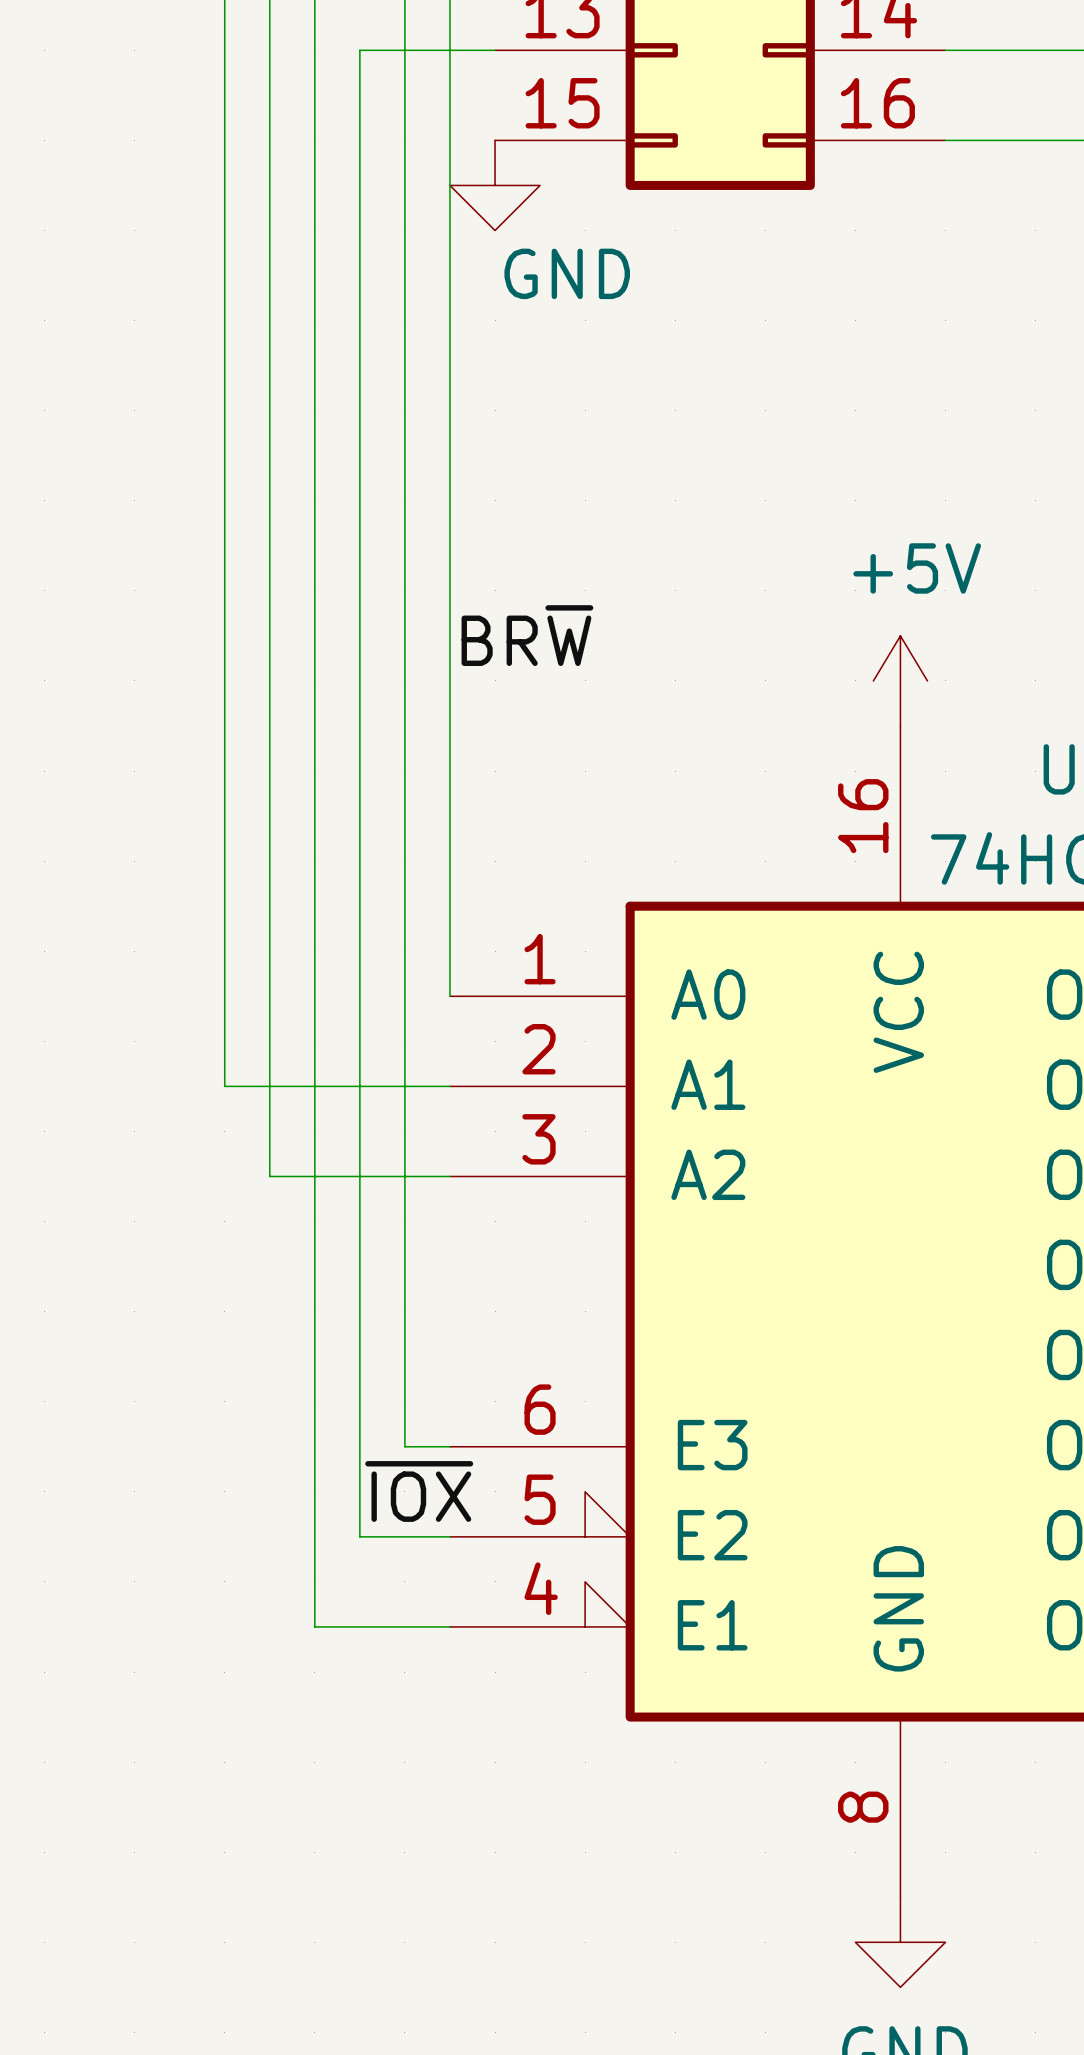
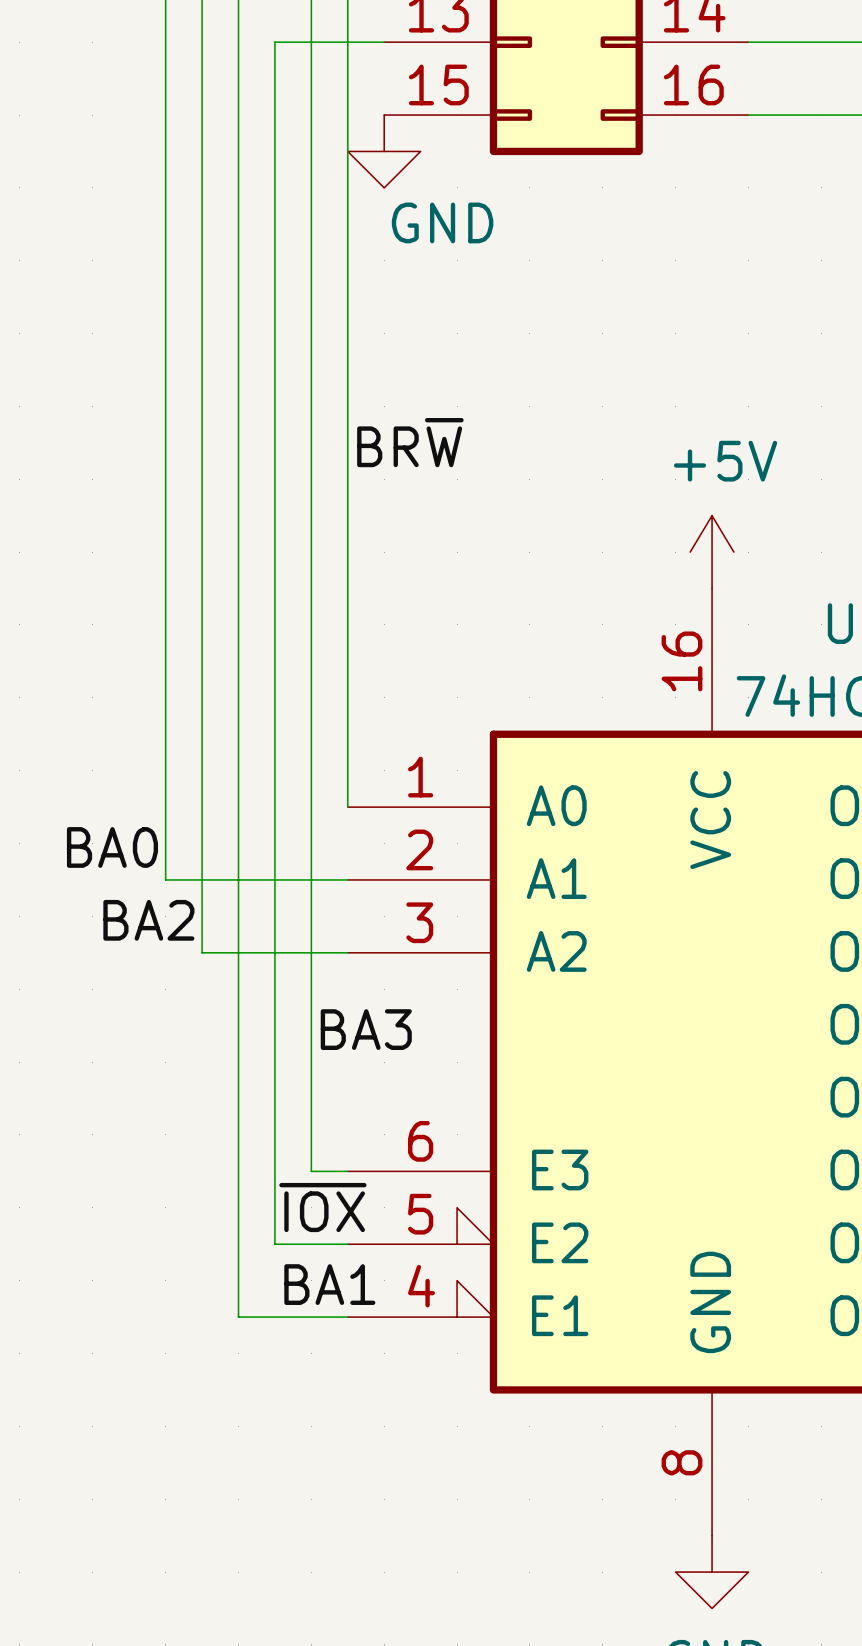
label position: BR~{W} (527, 635) -> BR~{W} (410, 442)
label: none -> BA0 (112, 847)
label: none -> BA2 (148, 920)
label: none -> BA3 (366, 1029)
label: none -> BA1 (329, 1284)

